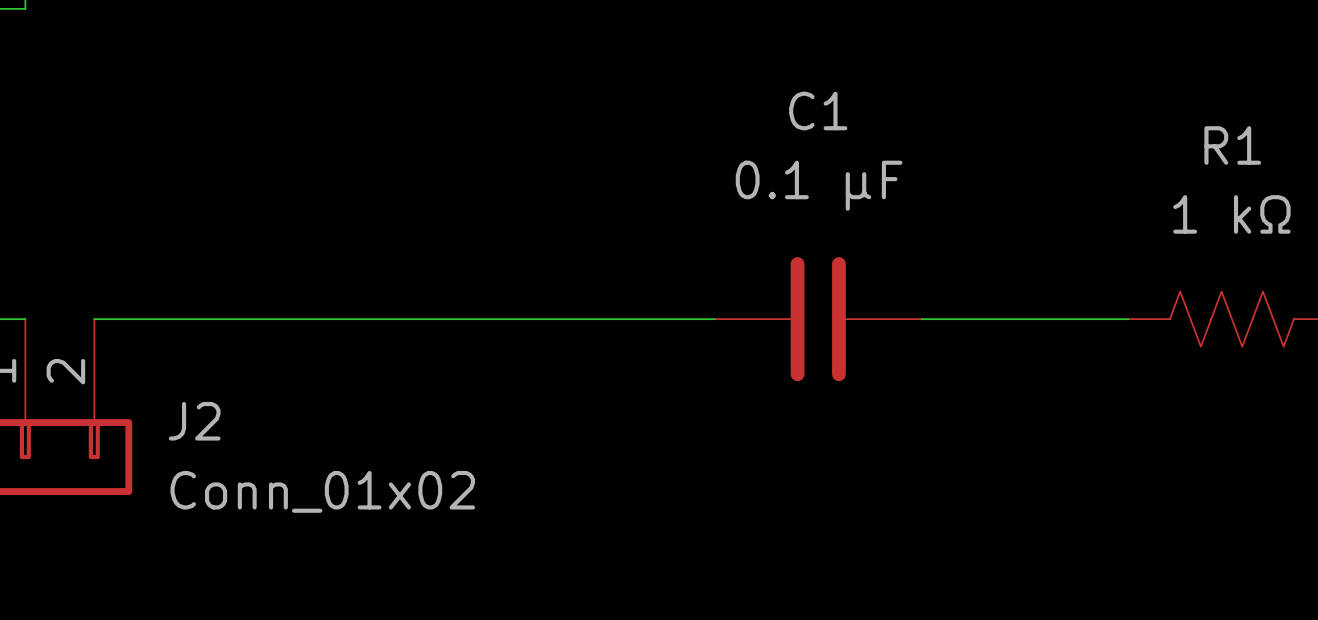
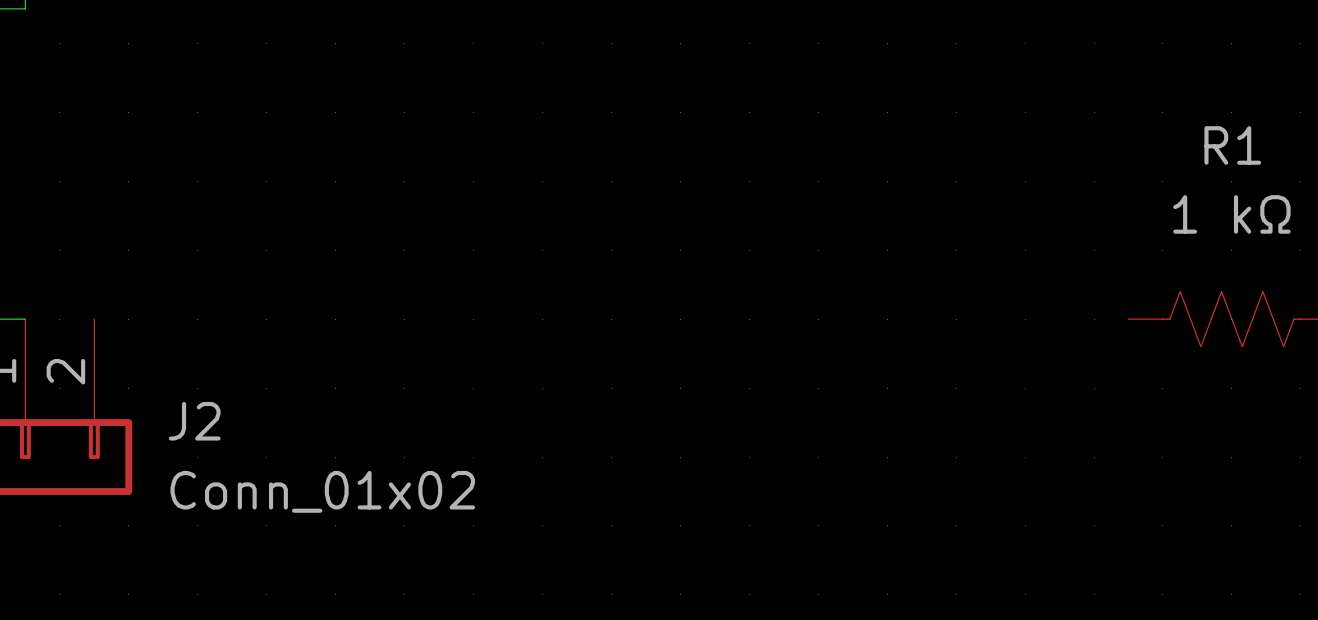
wire: (94, 319) (714, 319) -> none
C1: 0.1 µF (818, 319) -> none
wire: (921, 319) (1128, 319) -> none

